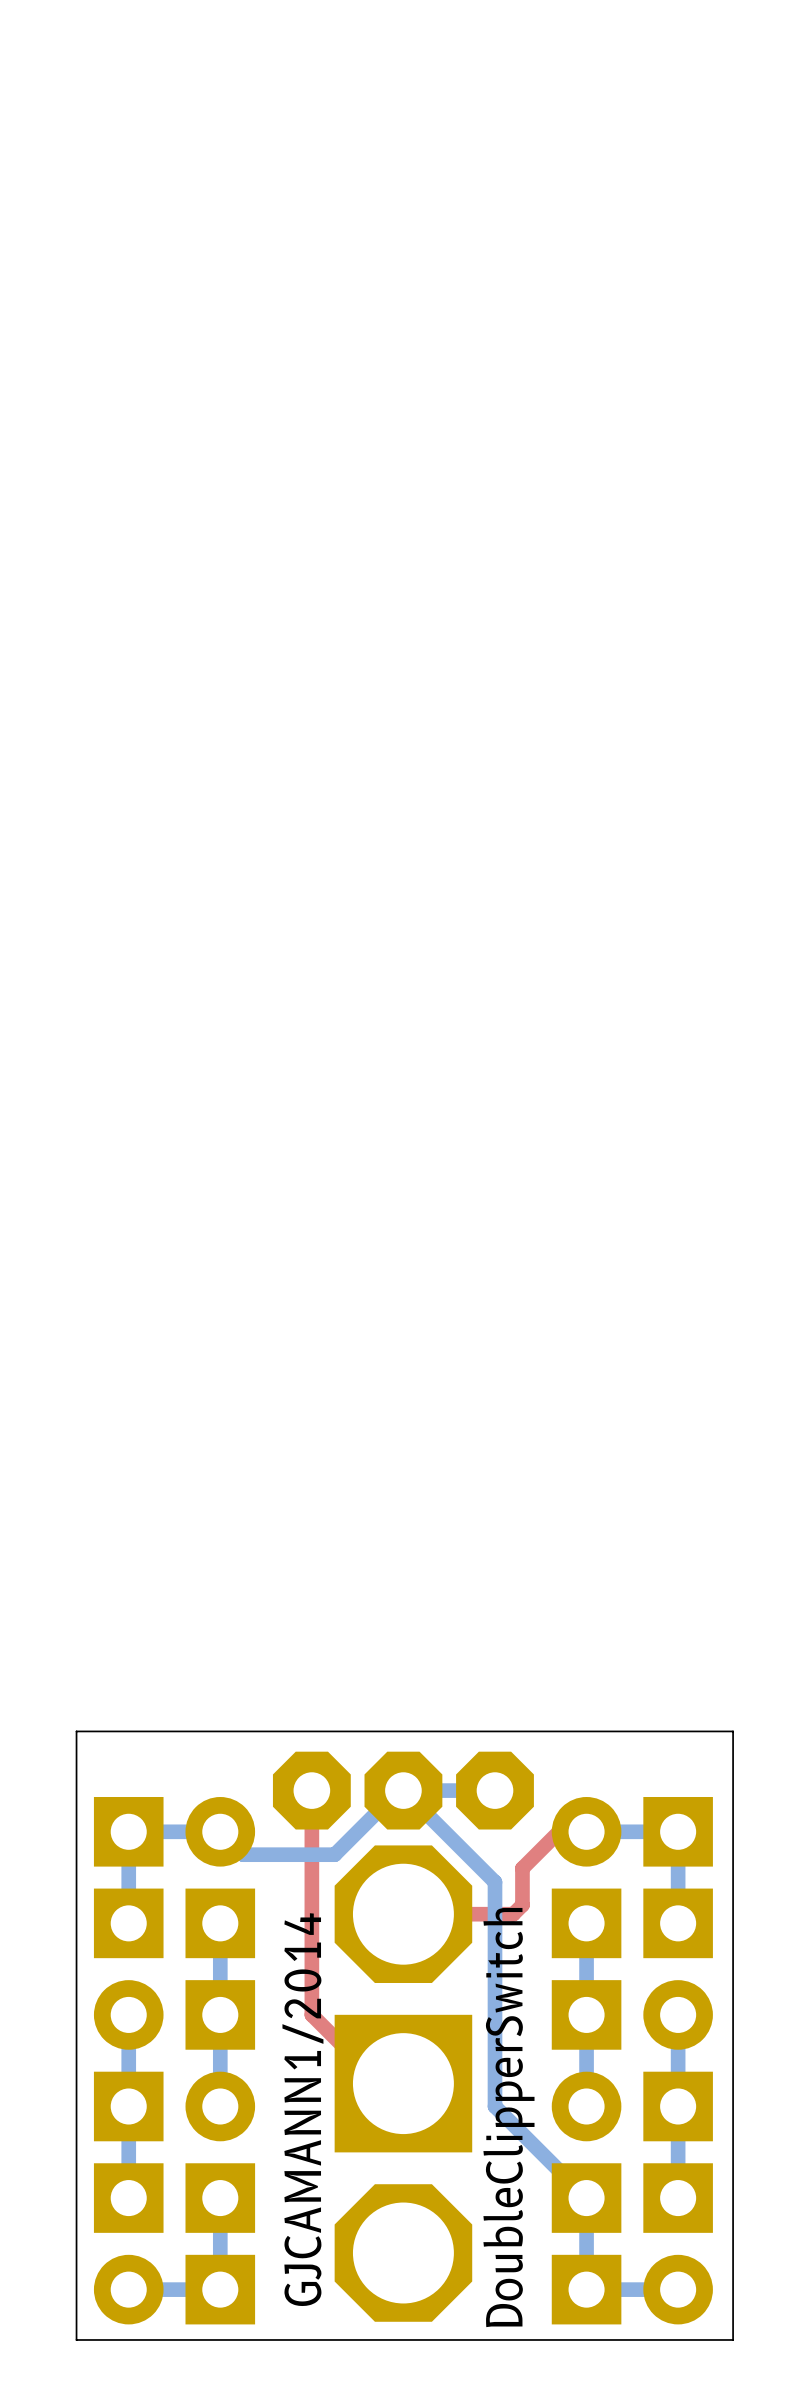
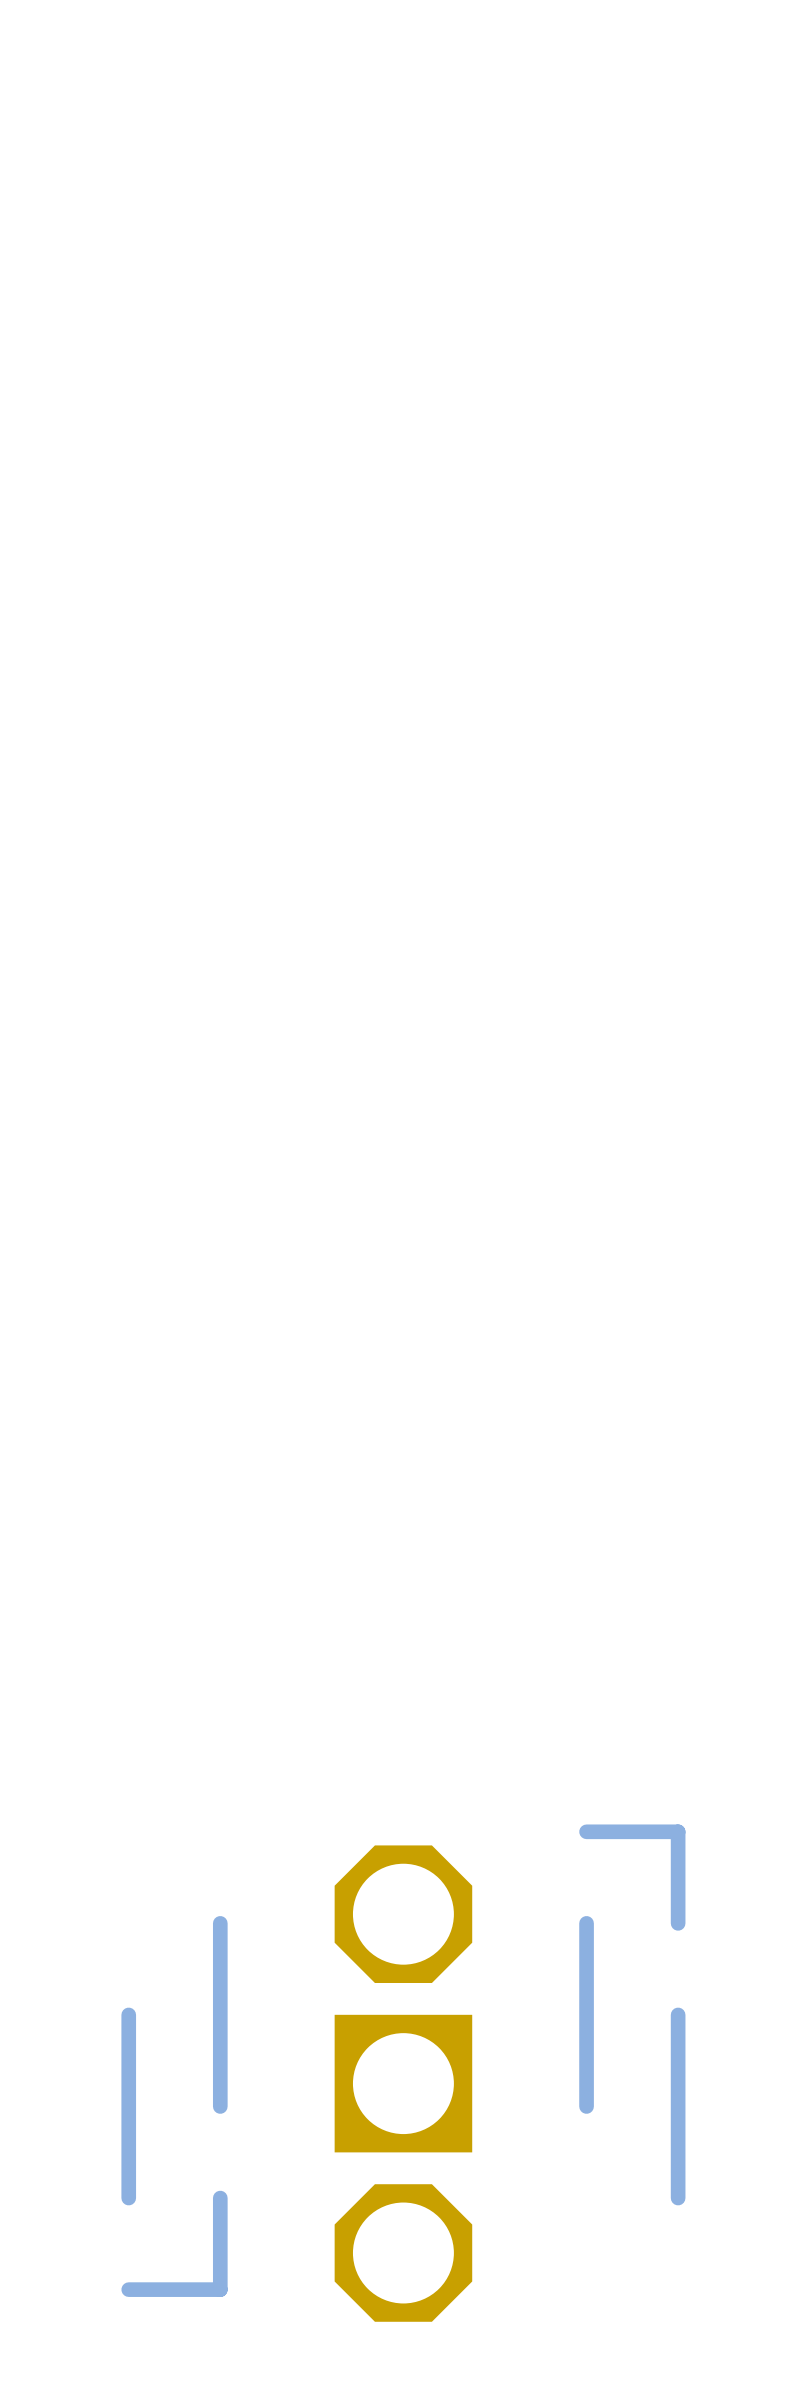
board edge: (733, 1731) (76, 1731) (76, 2339) (733, 2339) (733, 1731) -> none
top track: (311, 1790) (311, 2014) (385, 2088) (403, 2083) -> none
part: (311, 1790) -> none
bottom track: (403, 1790) (494, 1882) (494, 2106) (586, 2198) (586, 2289) (678, 2289) -> none
part: (403, 1790) -> none
bottom track: (494, 1790) (398, 1790) (334, 1854) (243, 1854) (220, 1831) (128, 1831) (128, 1923) -> none
part: (494, 1790) -> none
top track: (586, 1831) (559, 1831) (522, 1868) (522, 1905) (513, 1914) (403, 1914) -> none
part: (128, 1923) -> none
part: (220, 1923) -> none
part: (586, 1923) -> none
part: (678, 1923) -> none
text: GJCAMANN1/2014 (302, 2109) -> none
text: DoubleClipperSwitch (508, 2117) -> none
part: (128, 2198) -> none
part: (220, 2198) -> none
part: (586, 2198) -> none
part: (678, 2198) -> none

